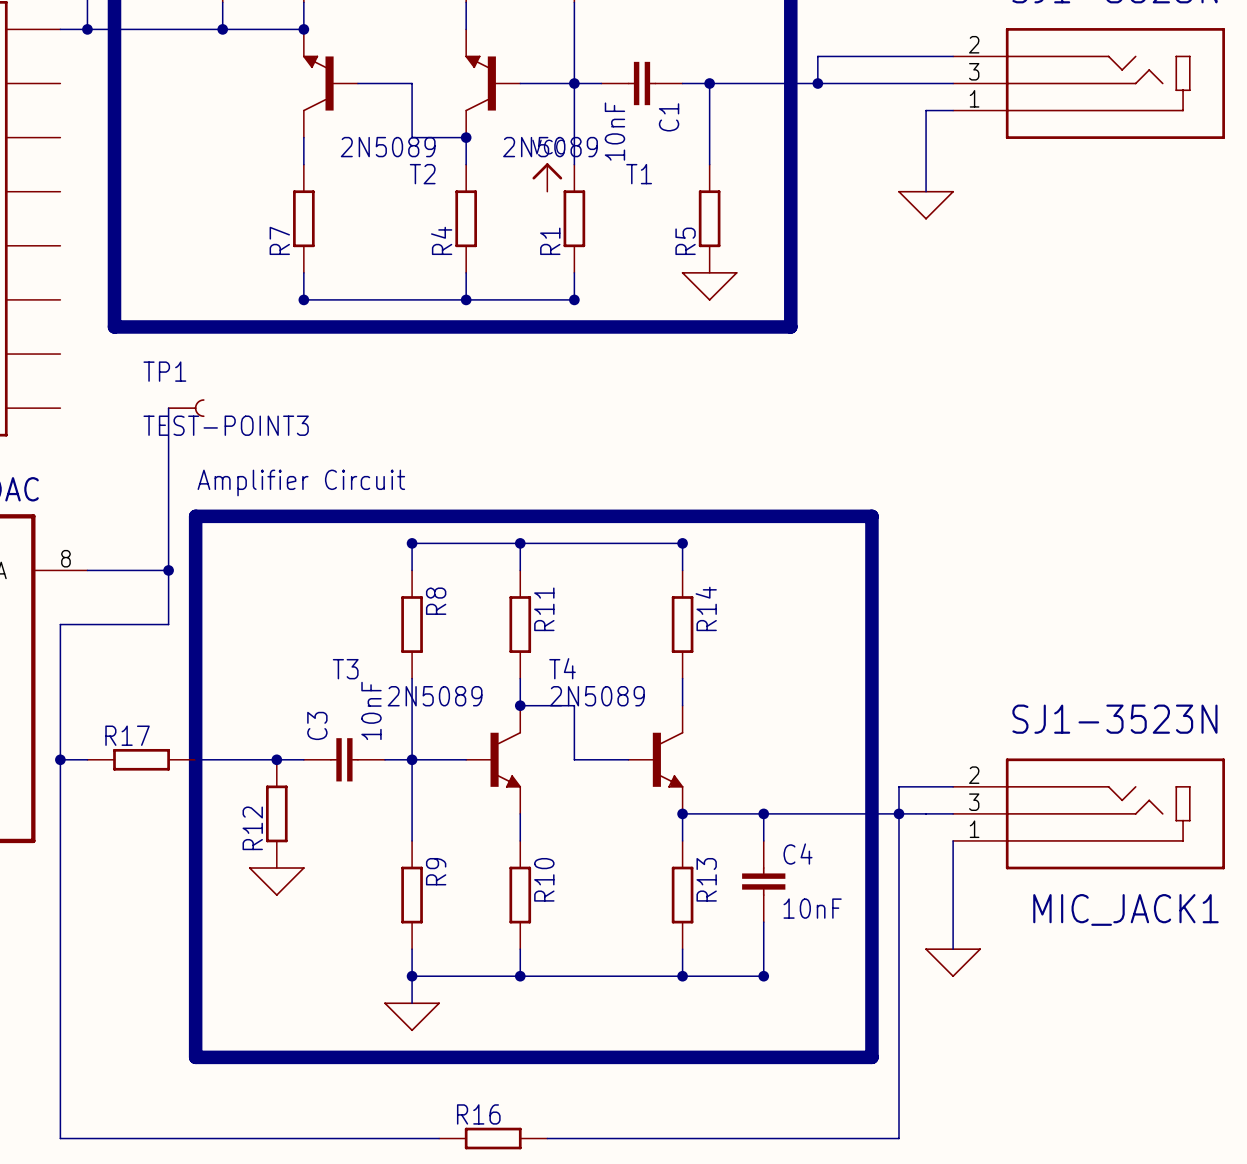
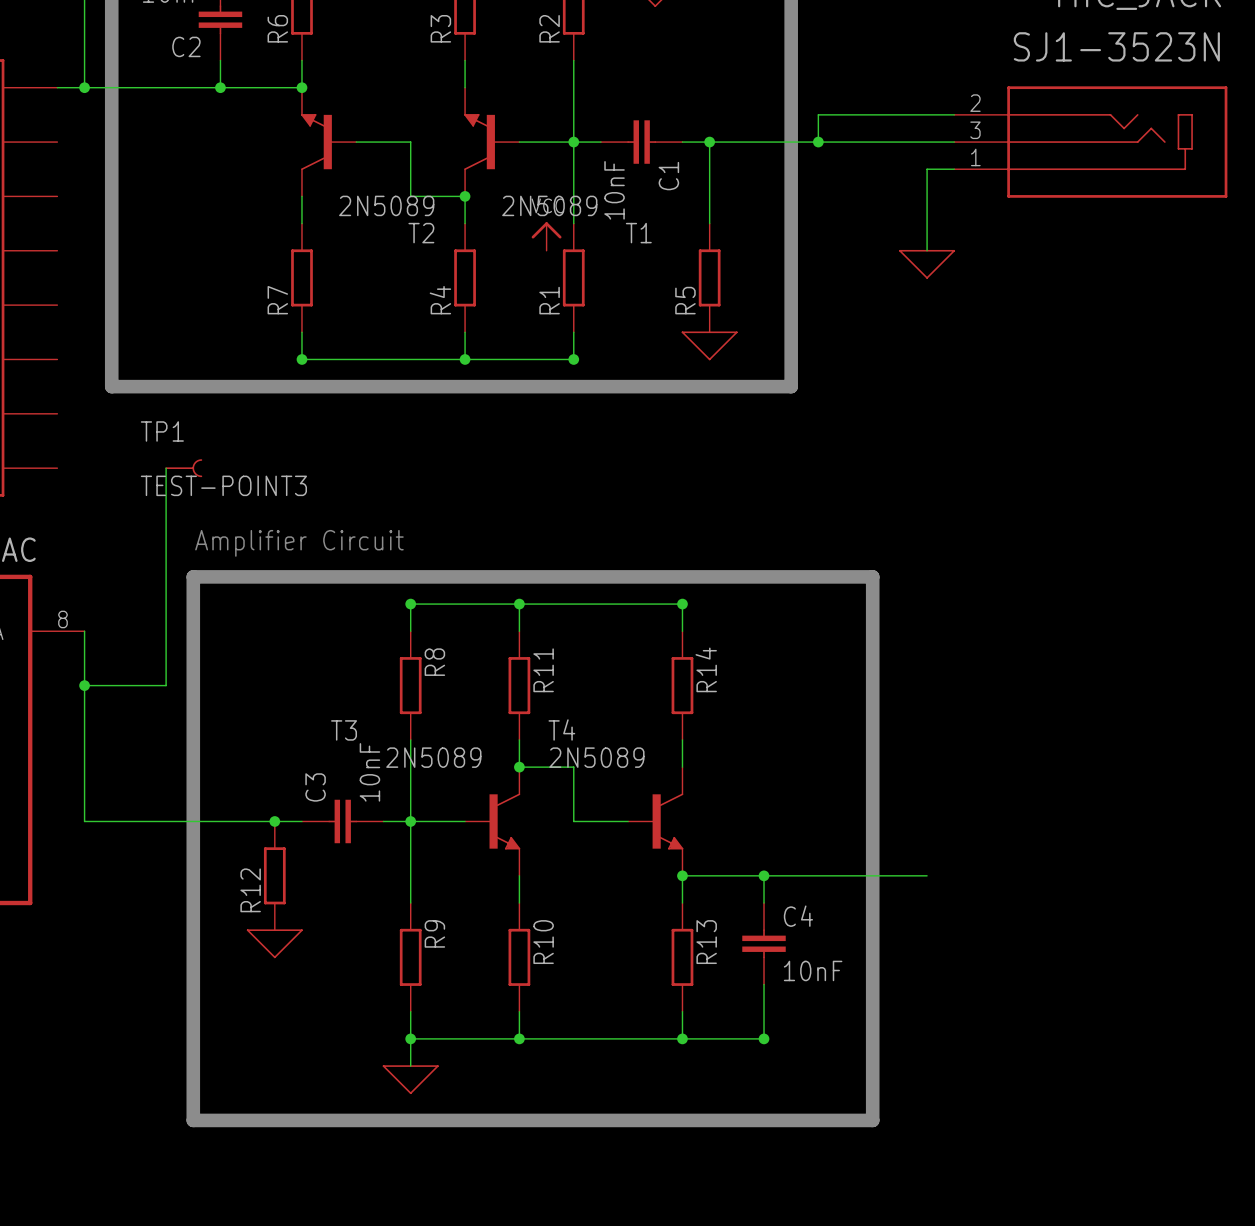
wire: (87, 570) (168, 570) -> (84, 631) (84, 821) (193, 821)
junction: (168, 570) -> none
wire: (87, 624) (60, 624) (60, 1138) (439, 1138) -> none
junction: none -> (84, 685)
wire: (60, 759) (87, 759) -> none
junction: (60, 759) -> none
R17: (141, 759) -> none
wire: (953, 786) (899, 786) (899, 1138) (547, 1138) -> none
junction: (899, 813) -> none
wire: (926, 813) (953, 813) -> none
MIC_JACK1: SJ1-3523N (1089, 813) -> none
wire: (953, 840) (953, 949) -> none
power symbol: (953, 962) -> none
R16: (493, 1138) -> none

